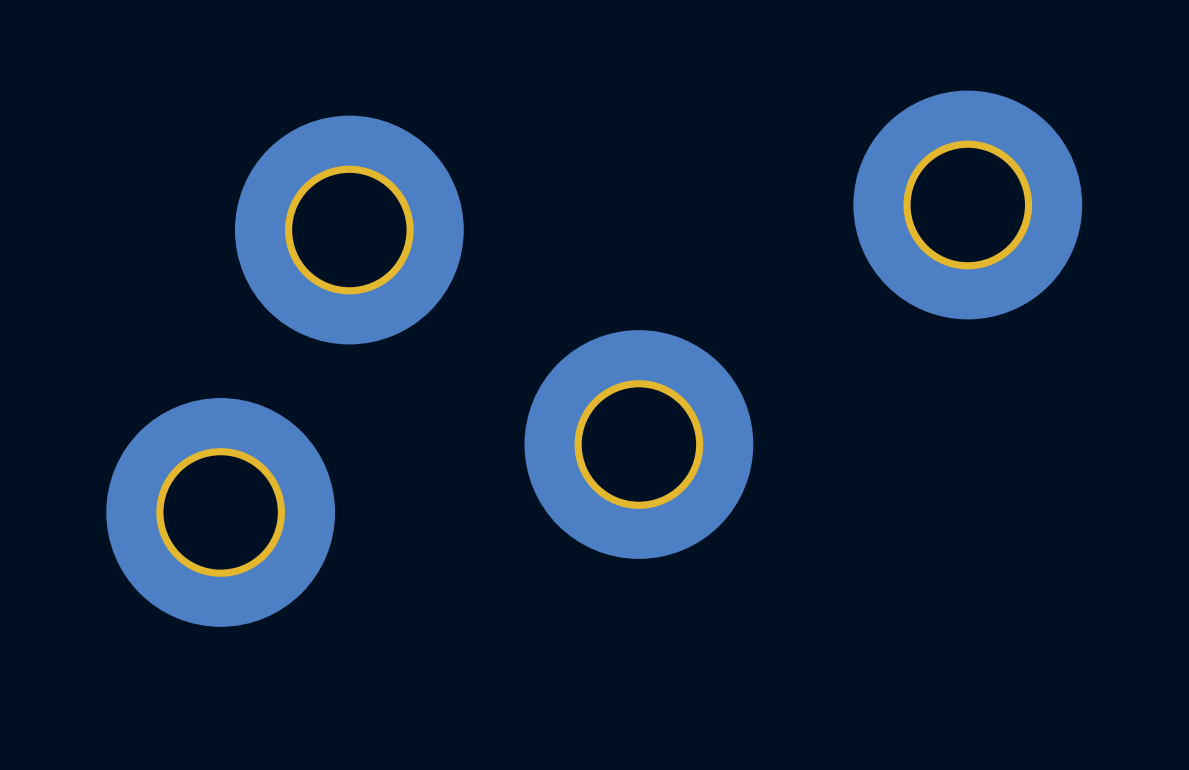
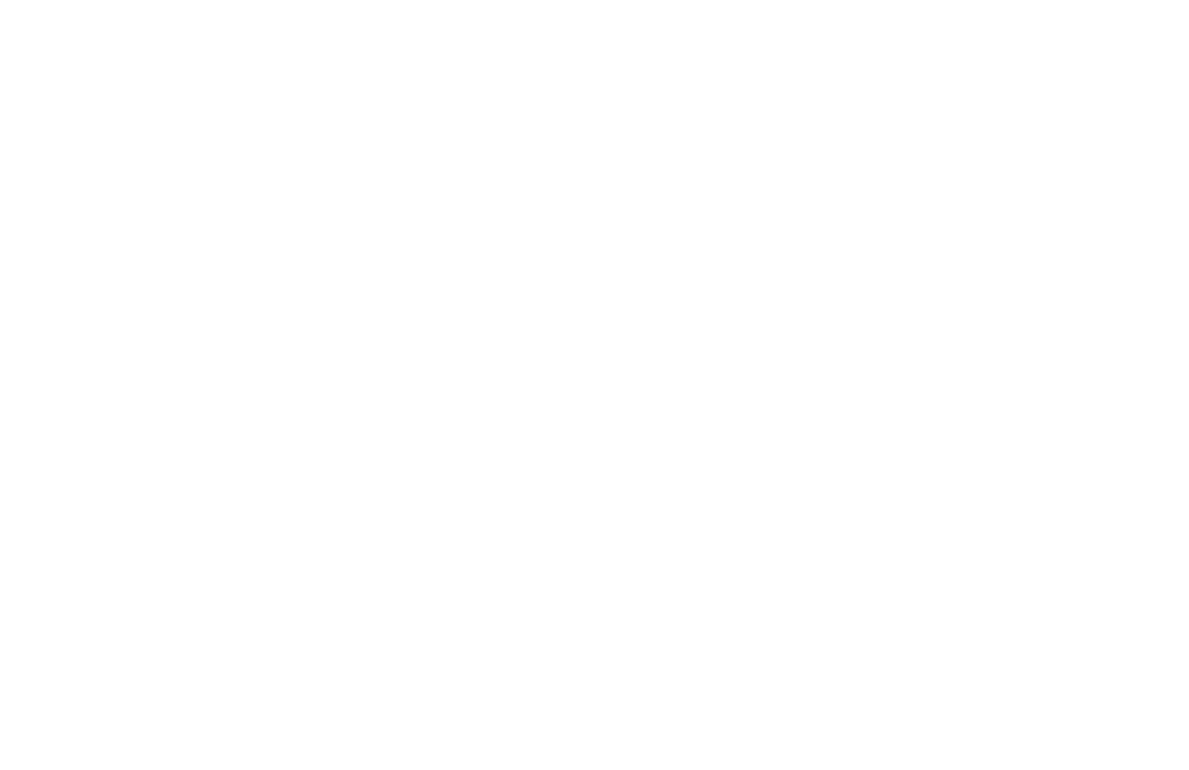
part: (967, 205) -> none
part: (349, 230) -> none
part: (638, 444) -> none
part: (220, 512) -> none

